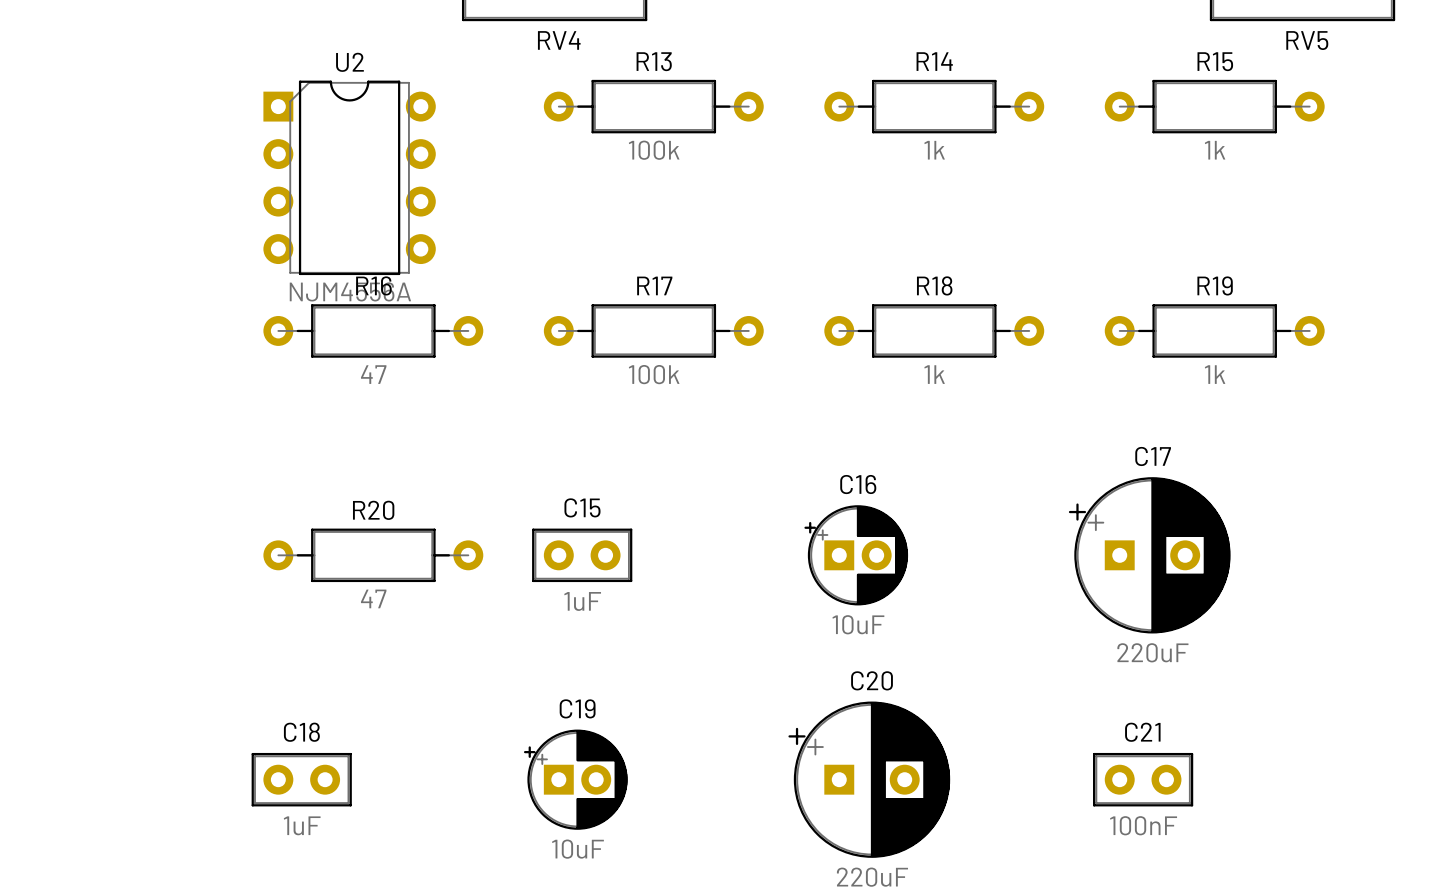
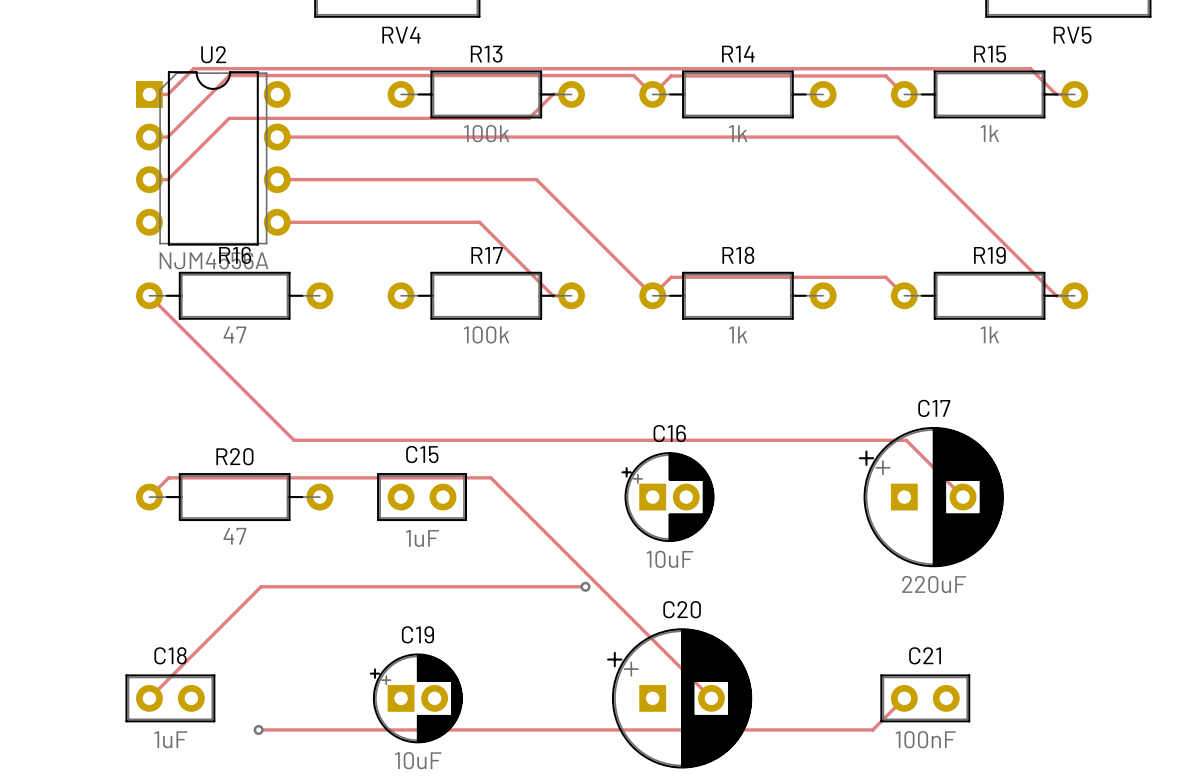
track: none -> (149, 94) (167, 94) (193, 68) (1030, 68) (1056, 94) (1074, 94)
track: none -> (571, 94) (553, 94) (529, 118) (229, 118) (167, 179) (149, 179)
track: none -> (904, 94) (885, 75) (671, 75) (652, 94) (633, 75) (229, 75) (167, 137) (149, 137)
track: none -> (277, 137) (897, 137) (1056, 295) (1074, 295)
track: none -> (277, 179) (536, 179) (652, 295) (671, 277) (885, 277) (904, 295)
track: none -> (277, 222) (479, 222) (553, 295) (571, 295)
track: none -> (149, 295) (293, 440) (906, 440) (963, 497)
track: none -> (149, 497) (168, 477) (490, 477) (711, 698)
track: none -> (585, 586) (261, 586) (149, 698)
via: none -> (585, 586)
track: none -> (904, 698) (872, 729) (258, 729)
via: none -> (258, 729)

